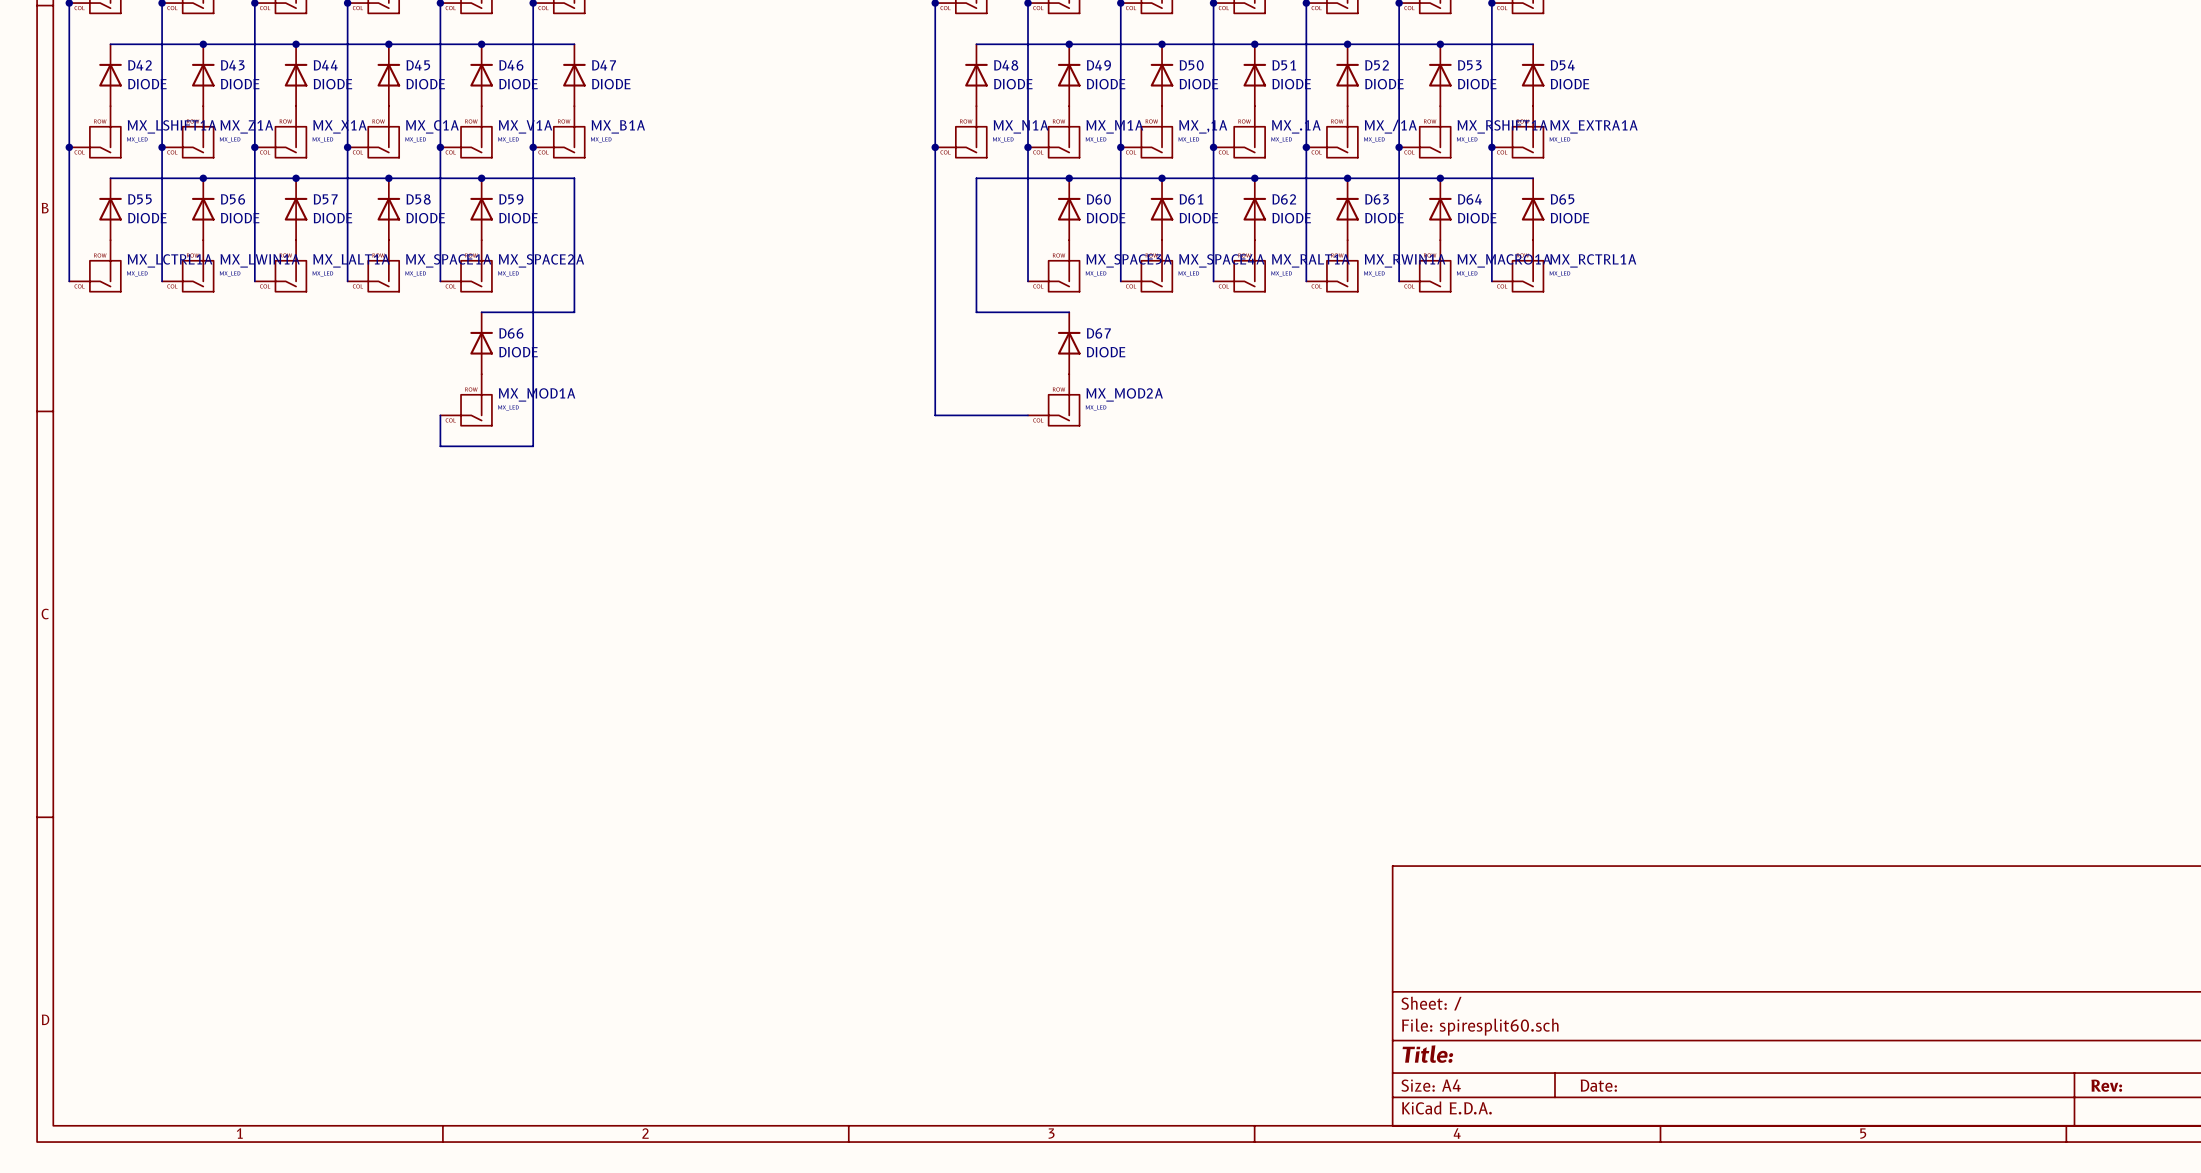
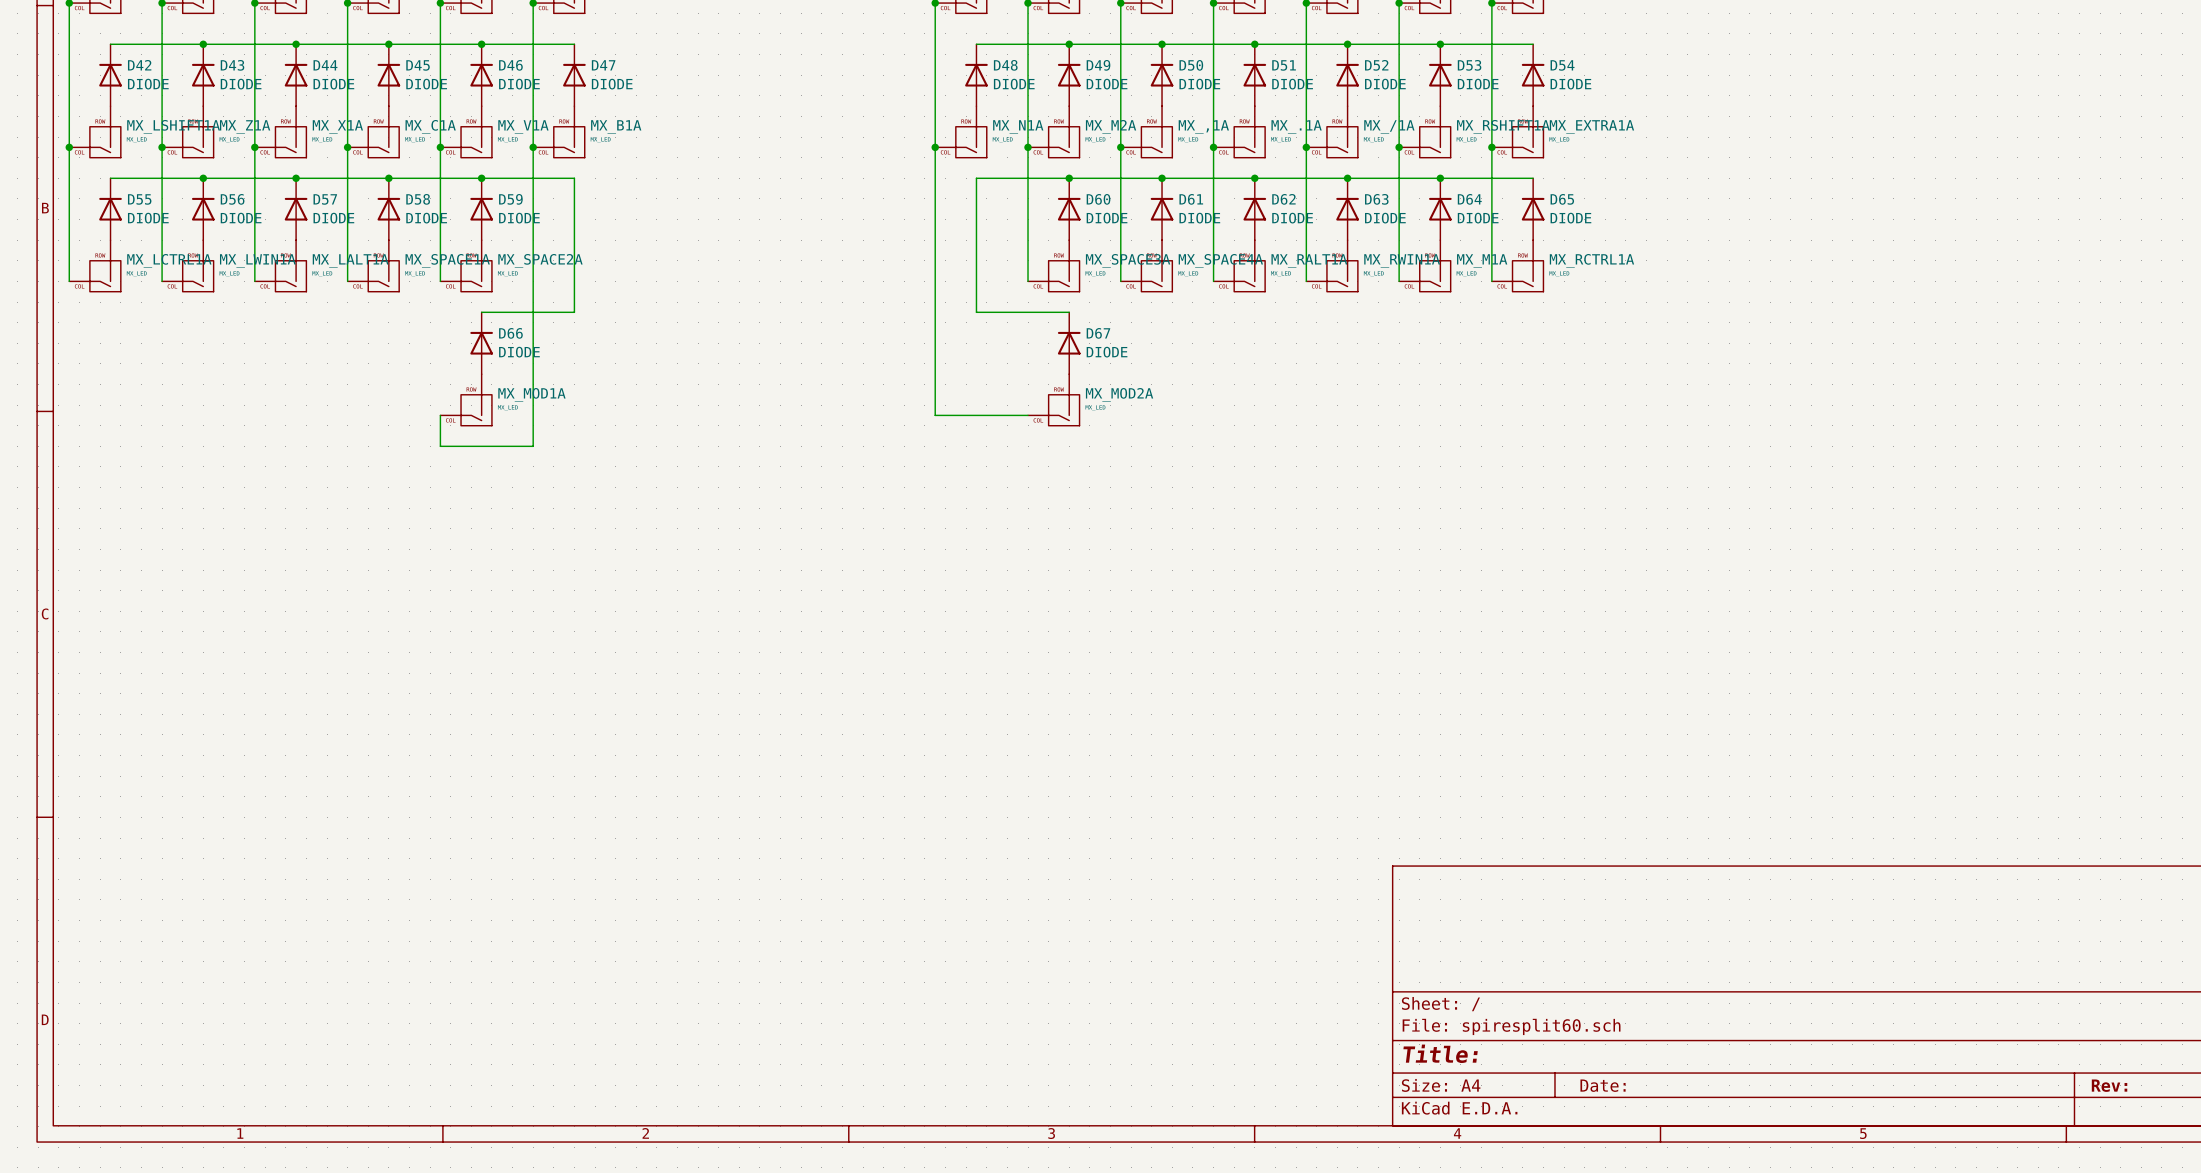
MX_M1A name: MX_M1A (1114, 126) -> MX_M2A (1111, 126)
MX_MACRO1A name: MX_MACRO1A (1504, 260) -> MX_M1A (1482, 261)

